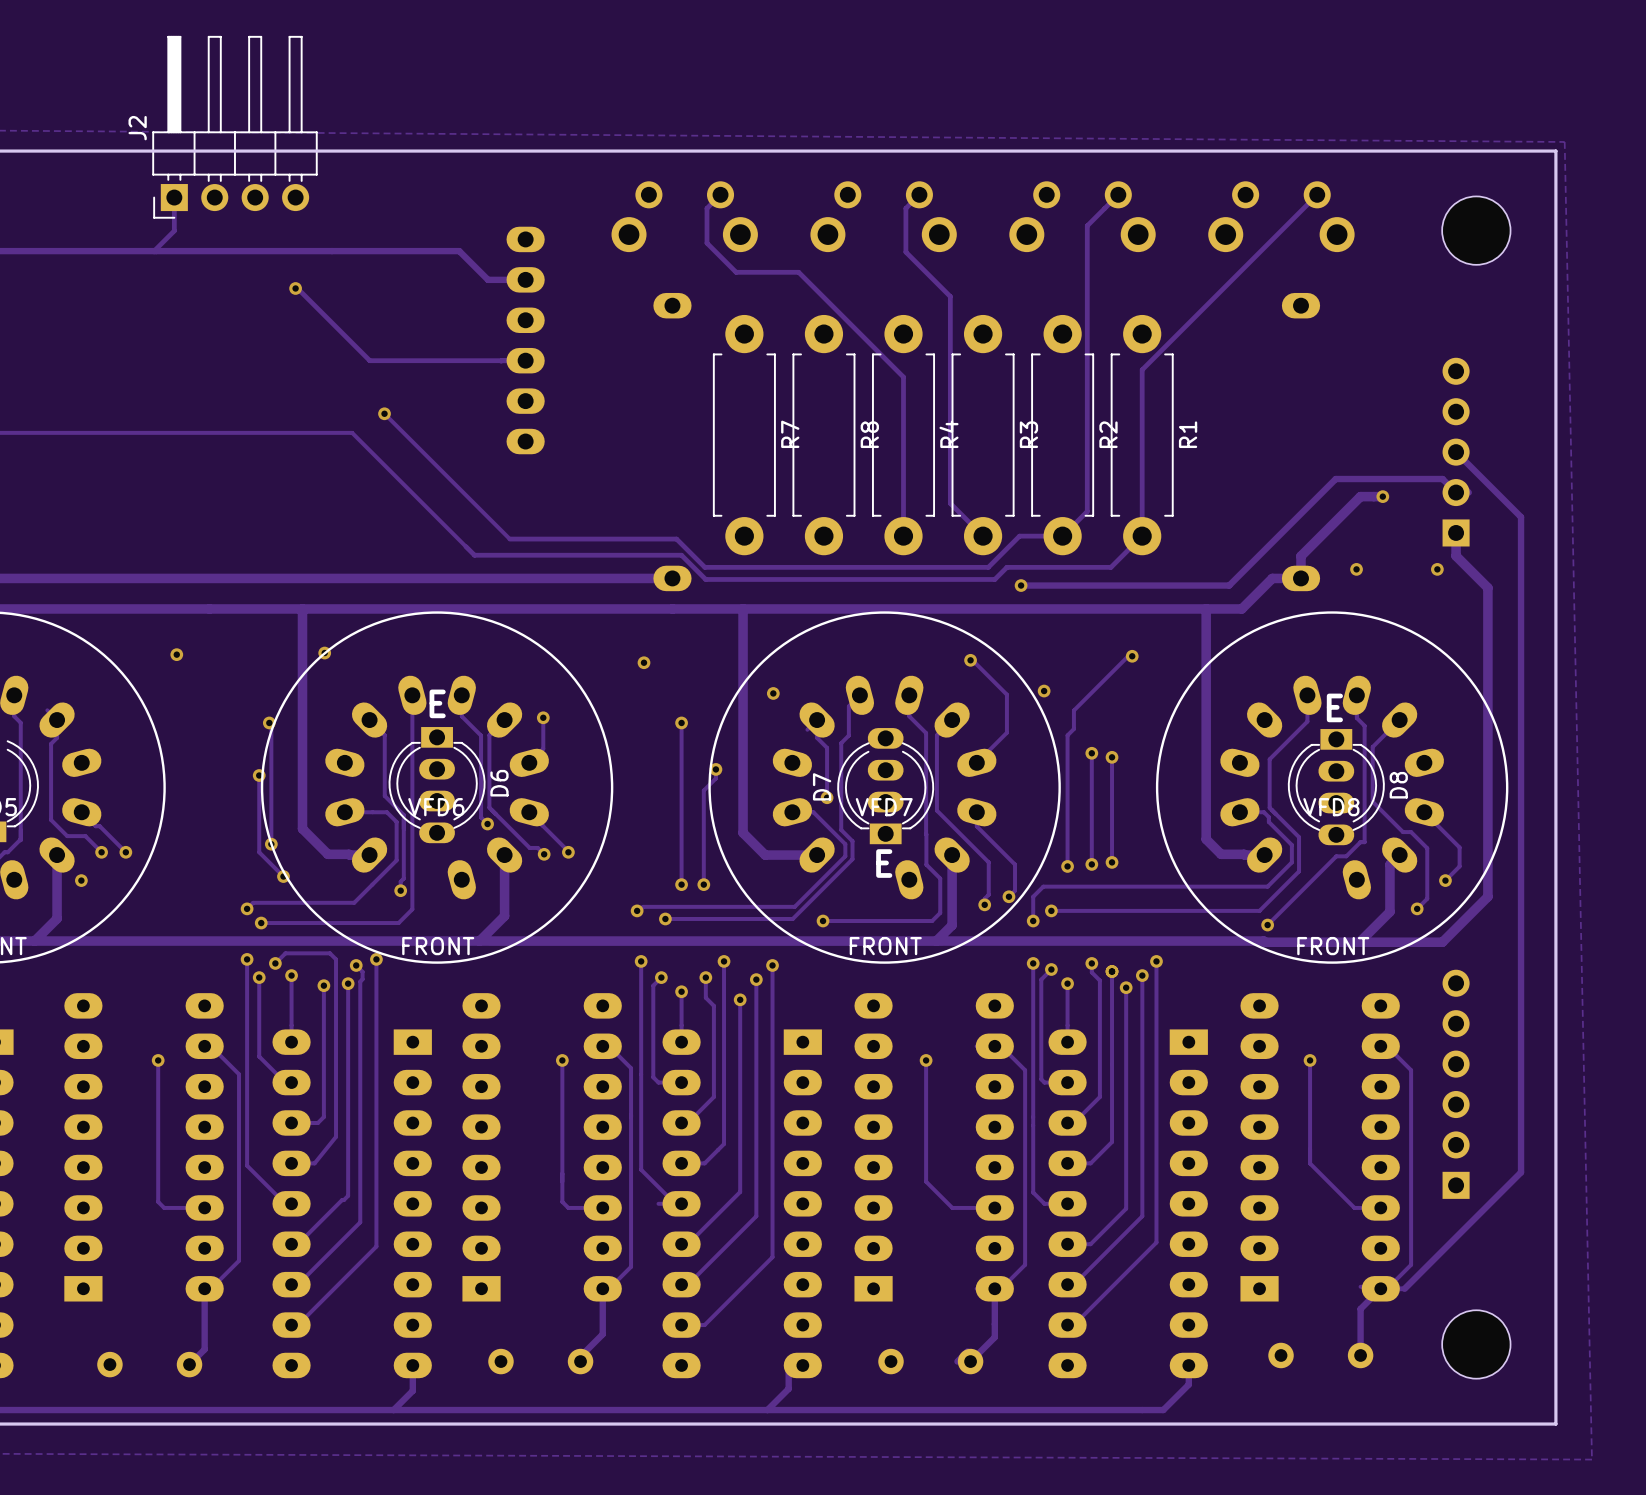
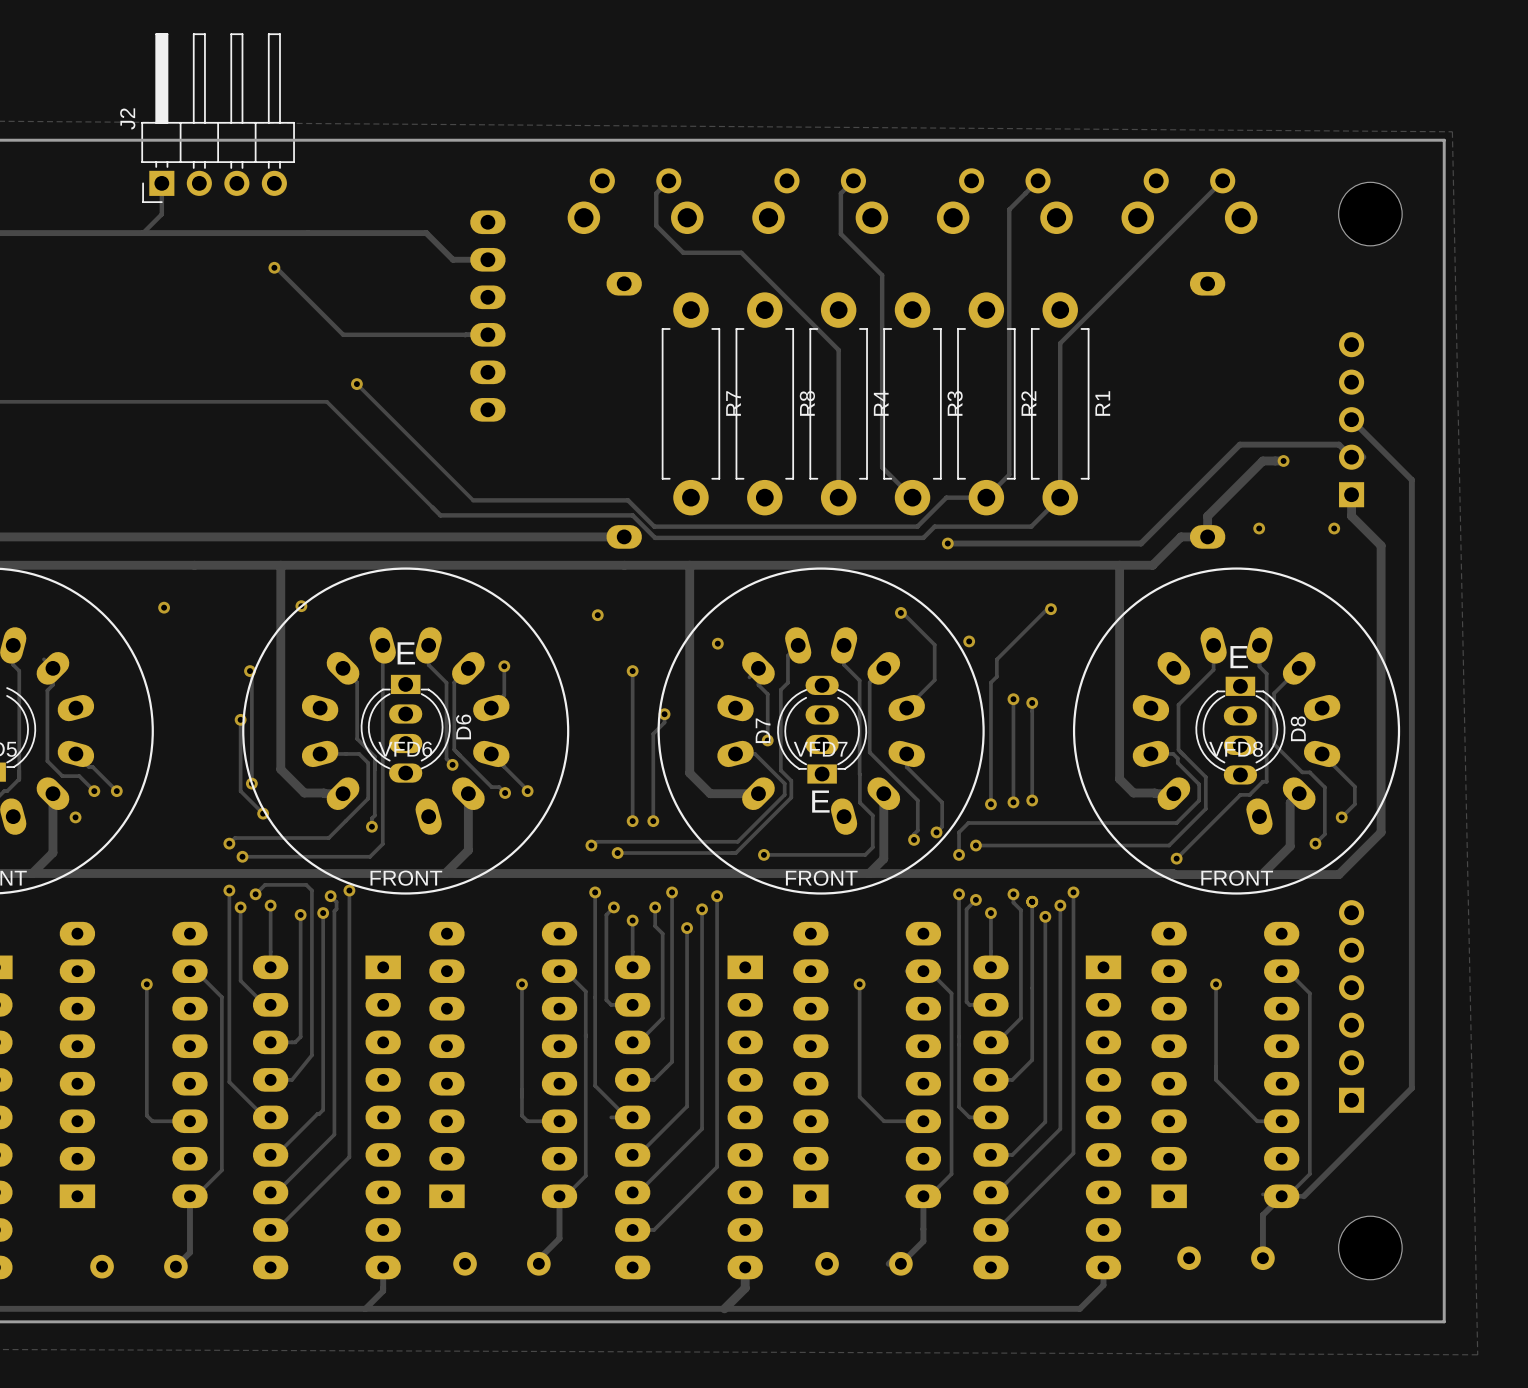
track: (788, 1365) (788, 1388) (767, 1410) -> none
track: none -> (745, 1267) (745, 1288) (724, 1308)

